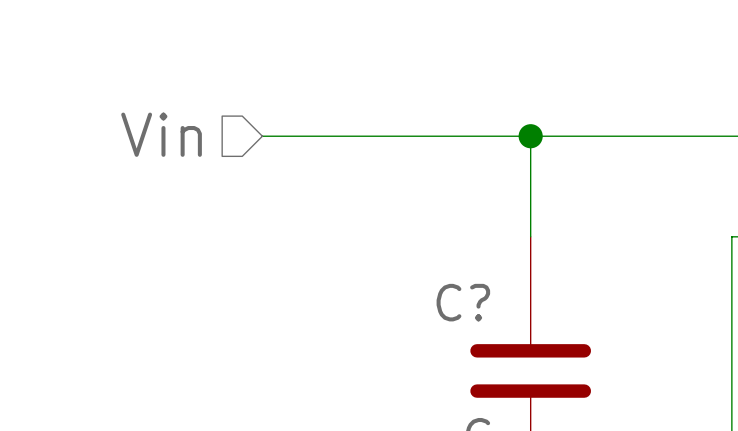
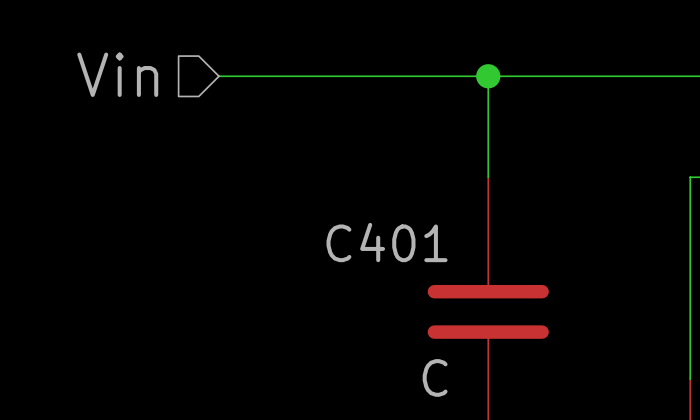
C? name: C? (463, 302) -> C401 (387, 242)

